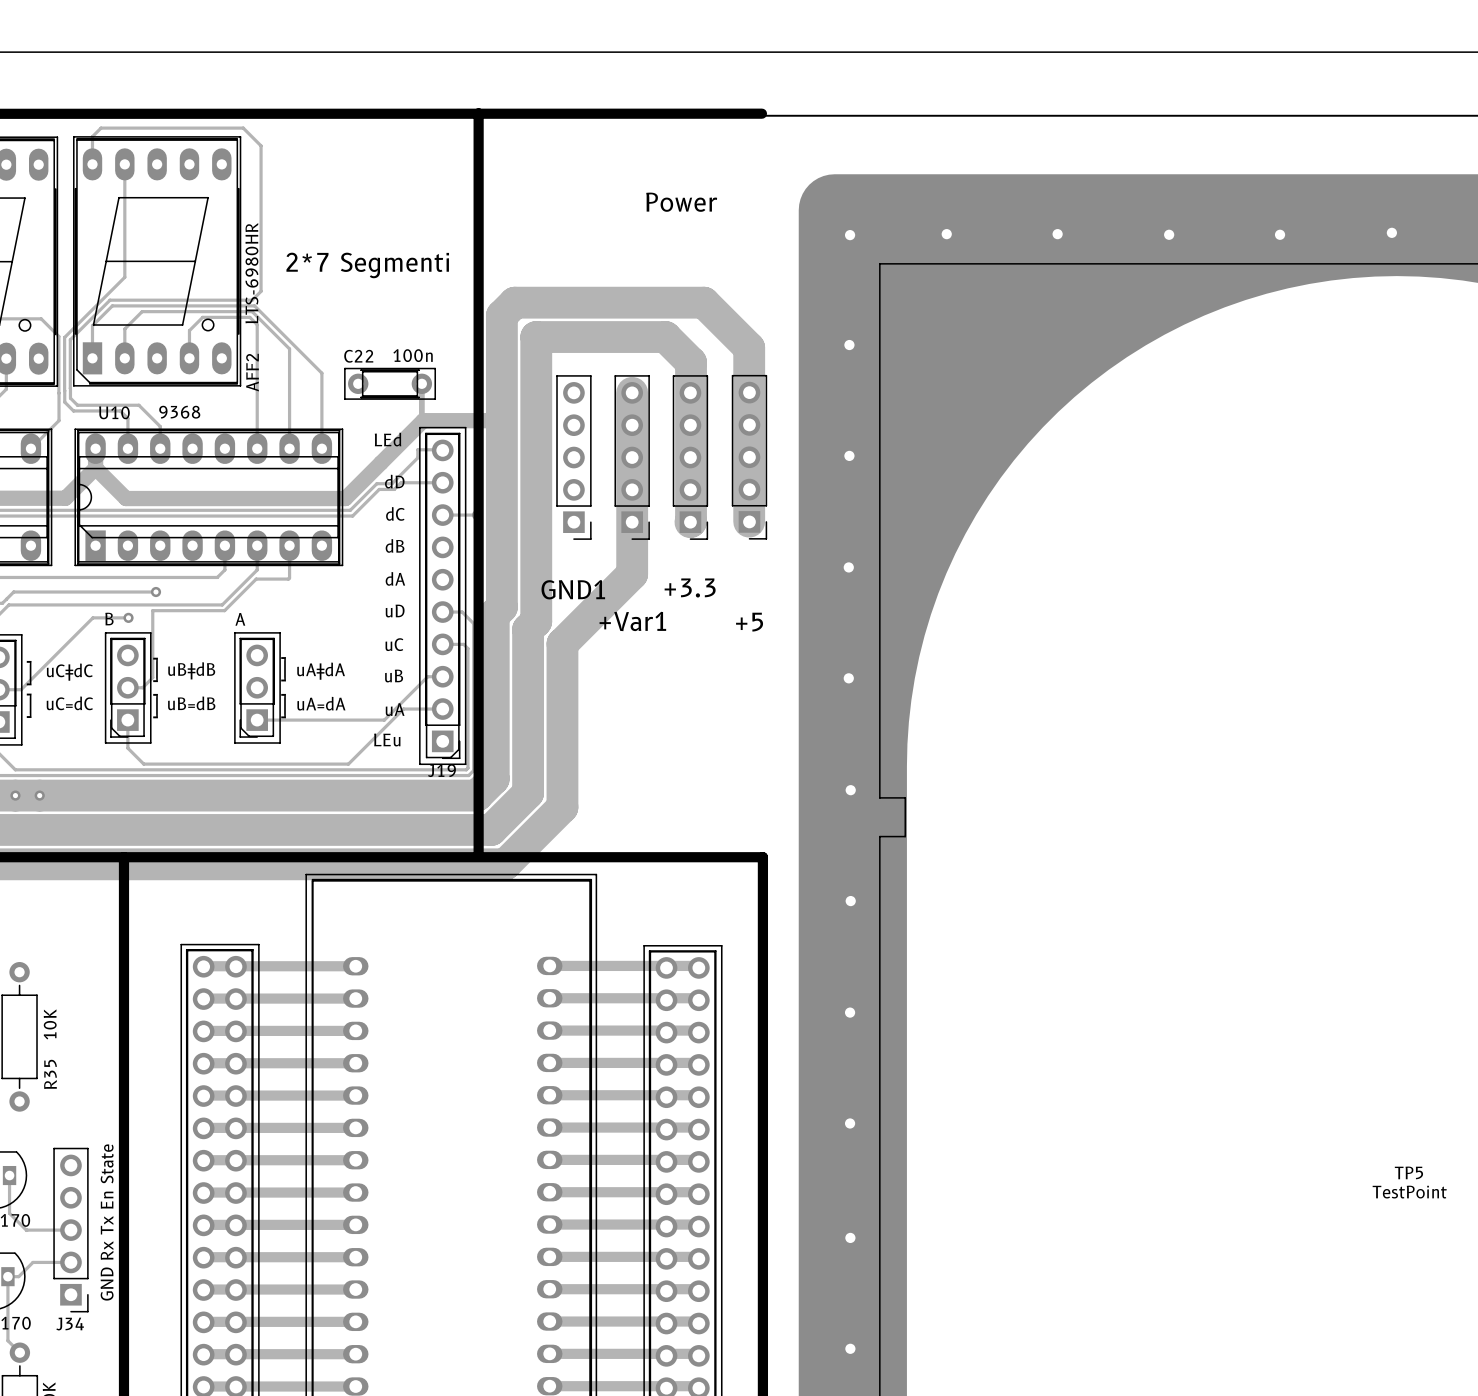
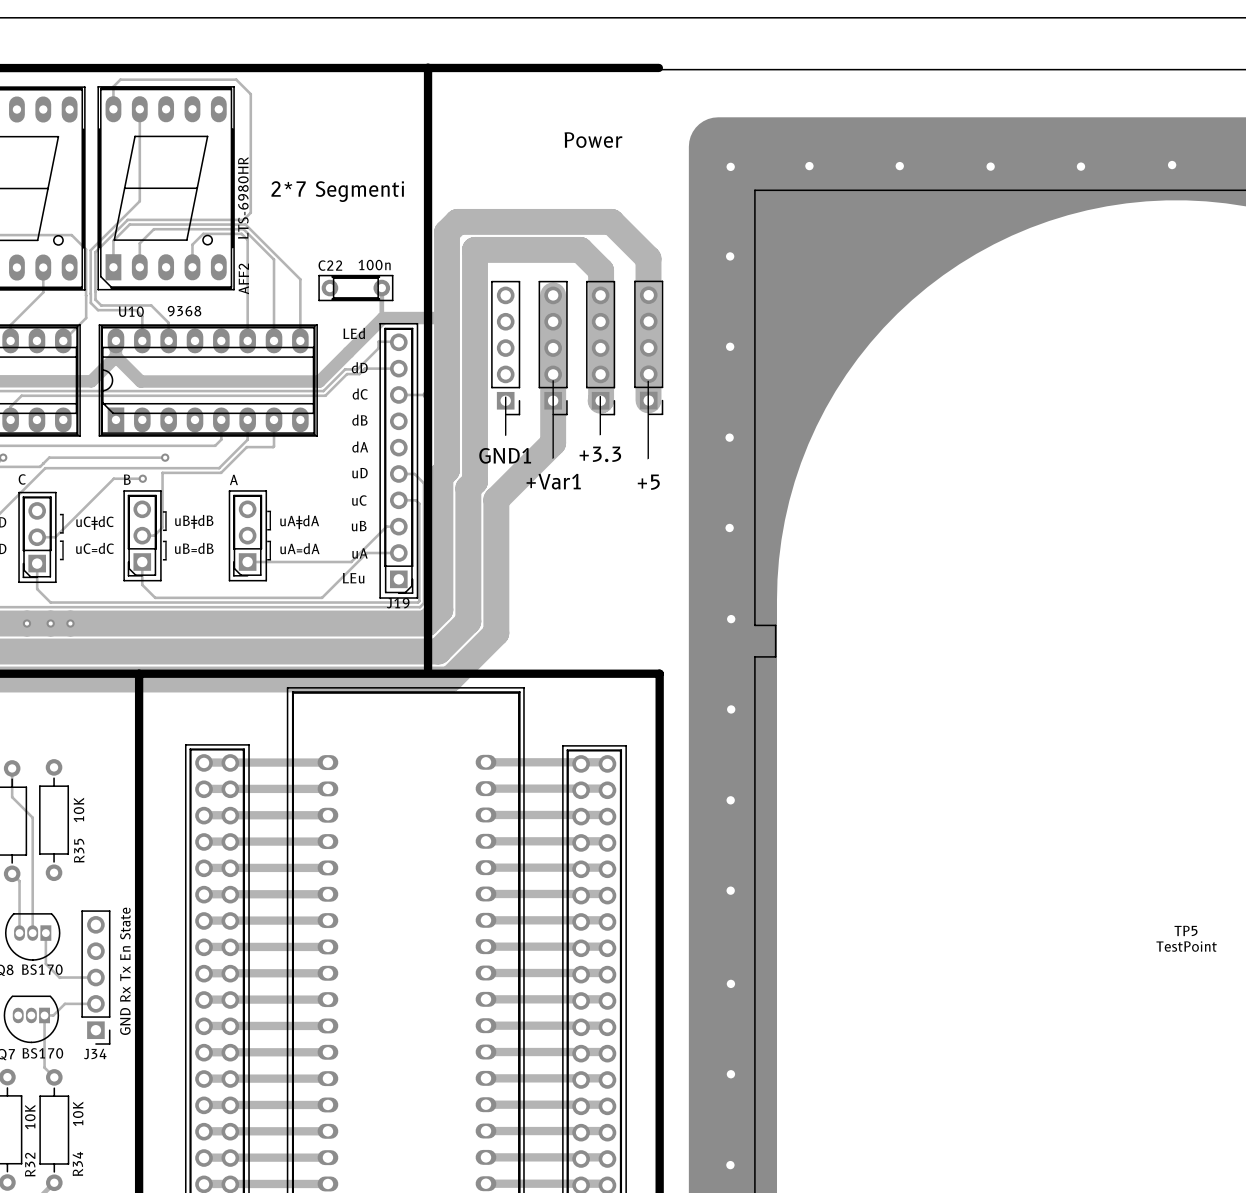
+3.3 text: none -> | (600, 415)
GND1 text: none -> | (505, 416)
+Var1 text: none -> | (553, 419)
+5 text: none -> | (648, 420)

